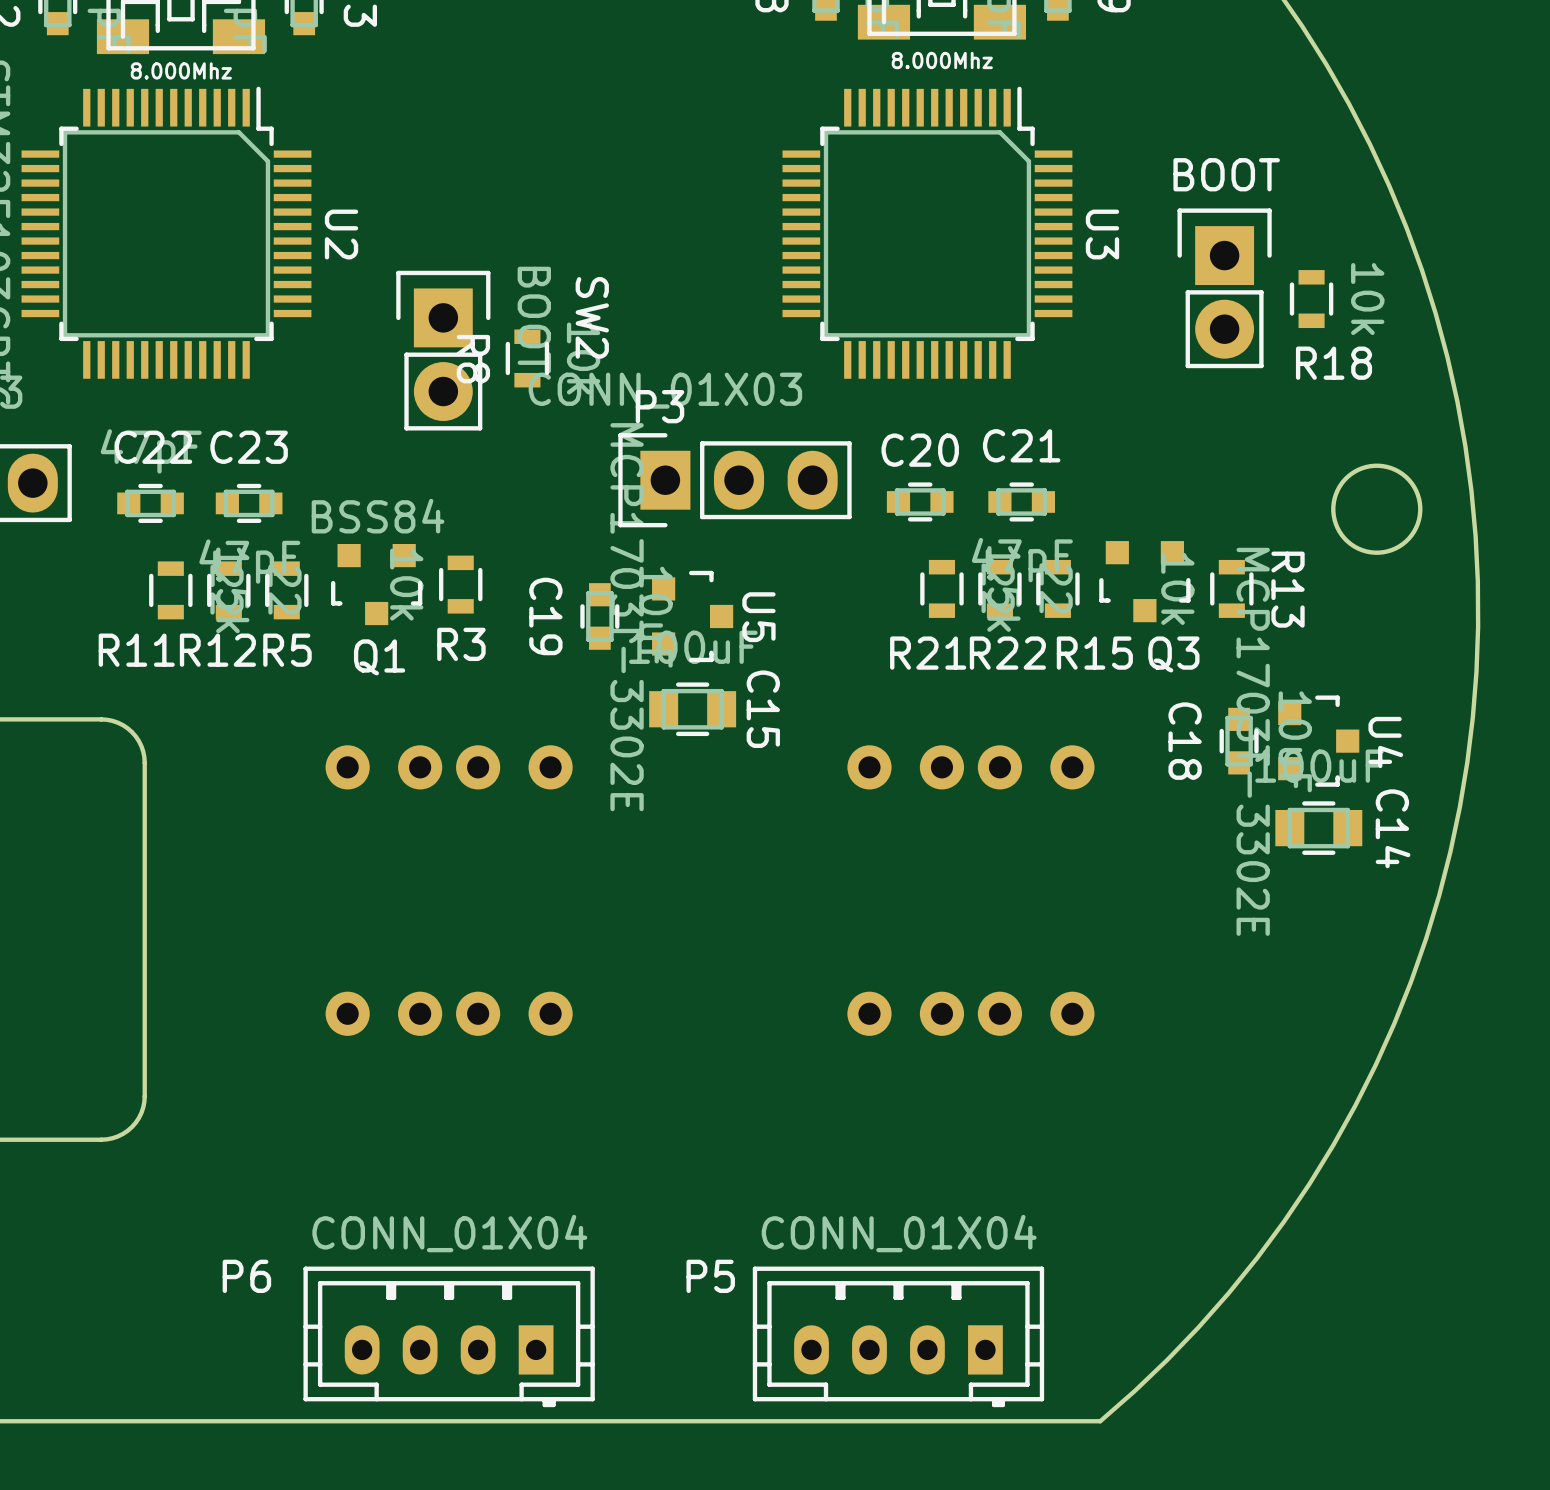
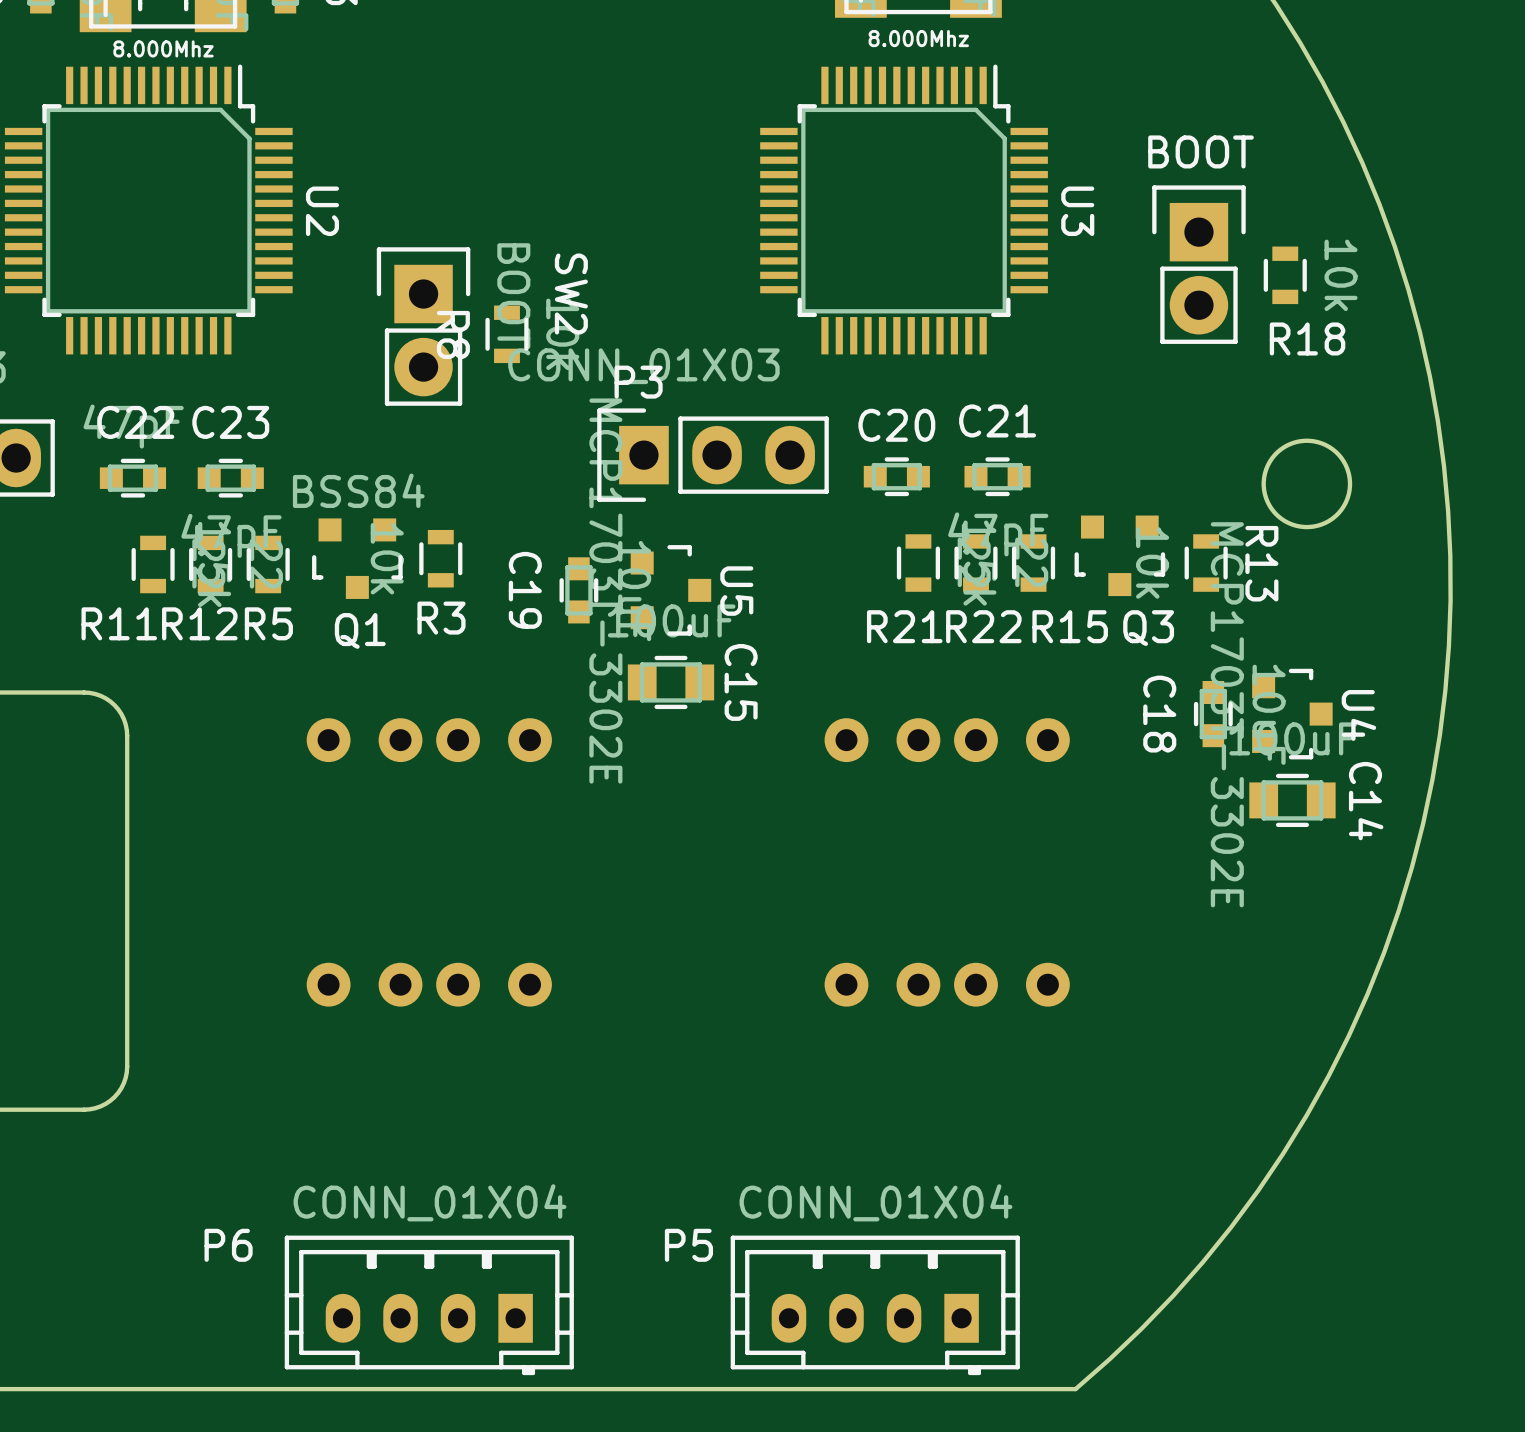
round board edge position: (1376, 509) -> (1306, 483)

